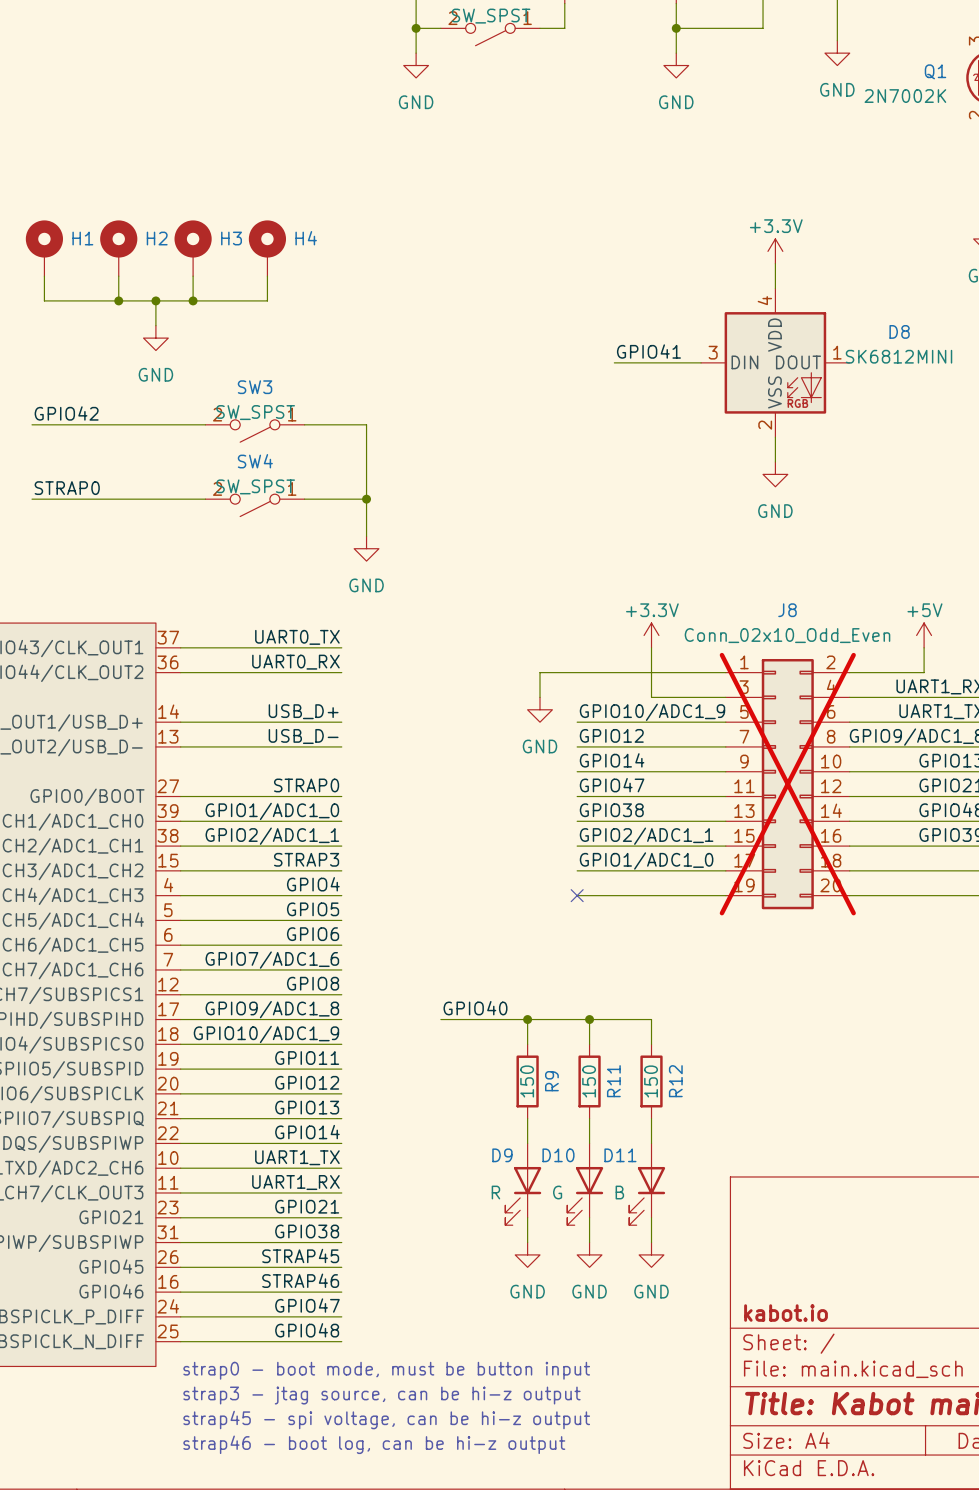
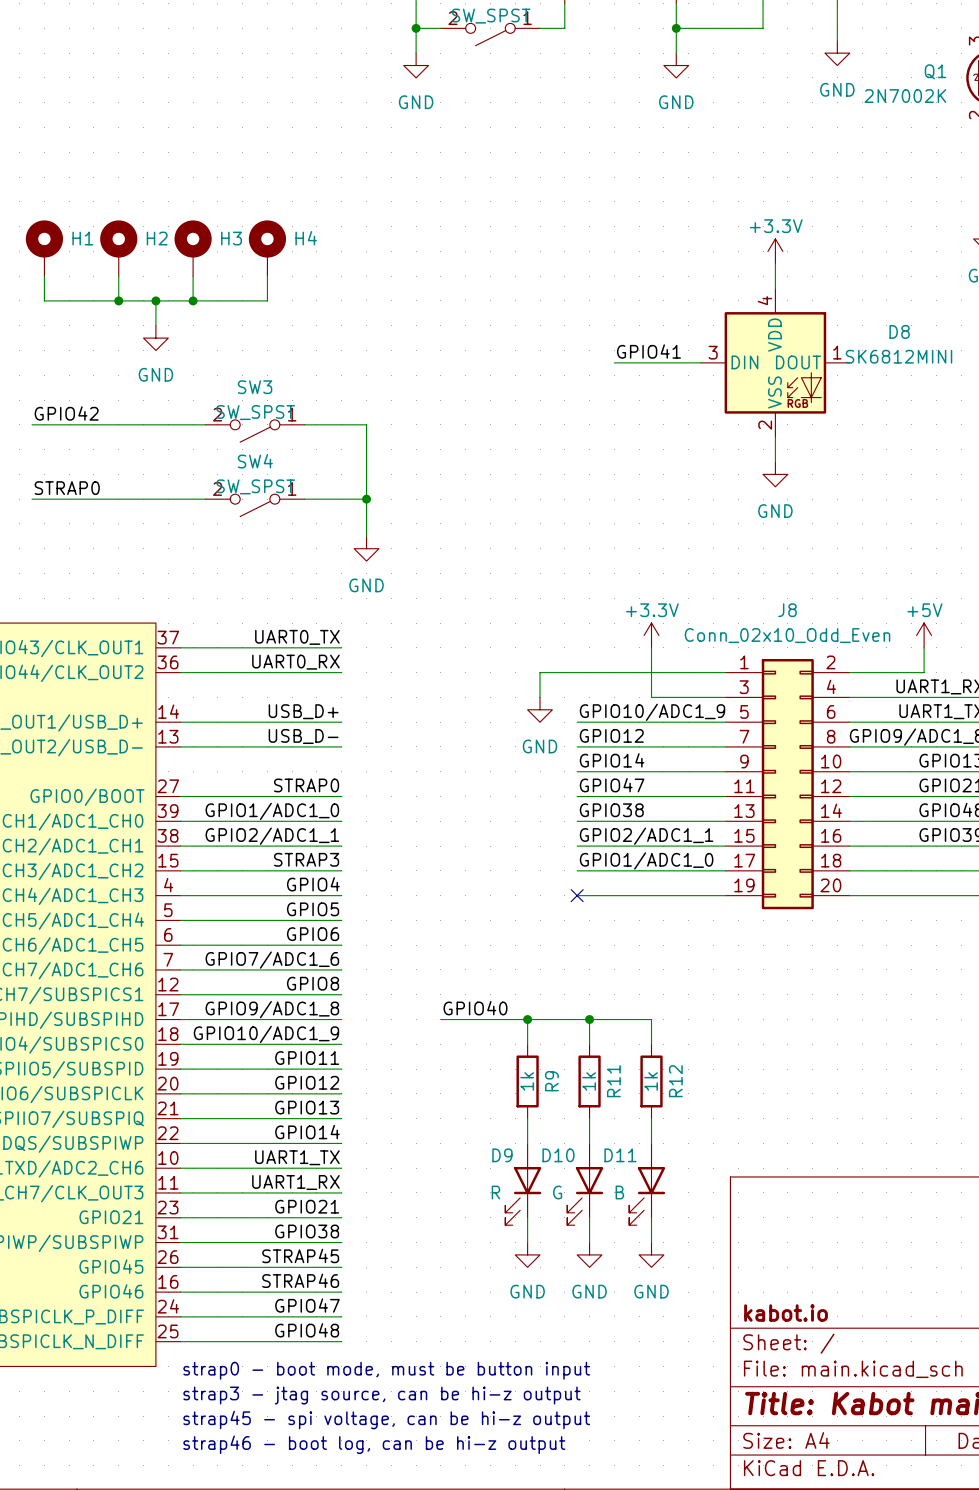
J8 do-not-place cross: (787, 784) -> none
R9 value: 150 (527, 1081) -> 1k (527, 1081)
R11 value: 150 (589, 1081) -> 1k (589, 1081)
R12 value: 150 (651, 1081) -> 1k (651, 1081)

